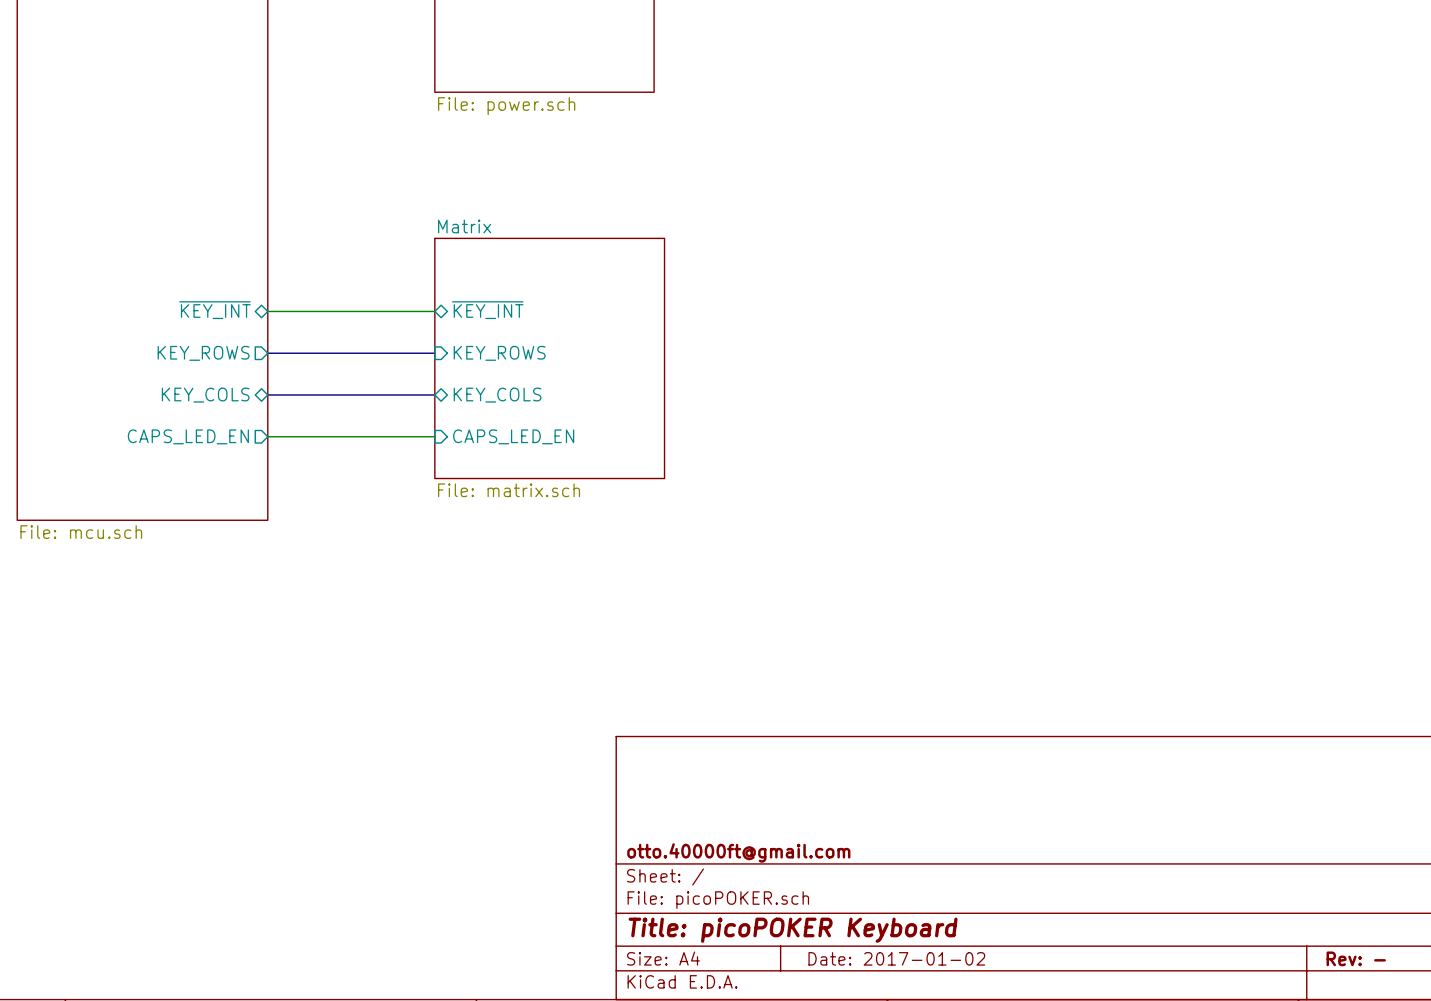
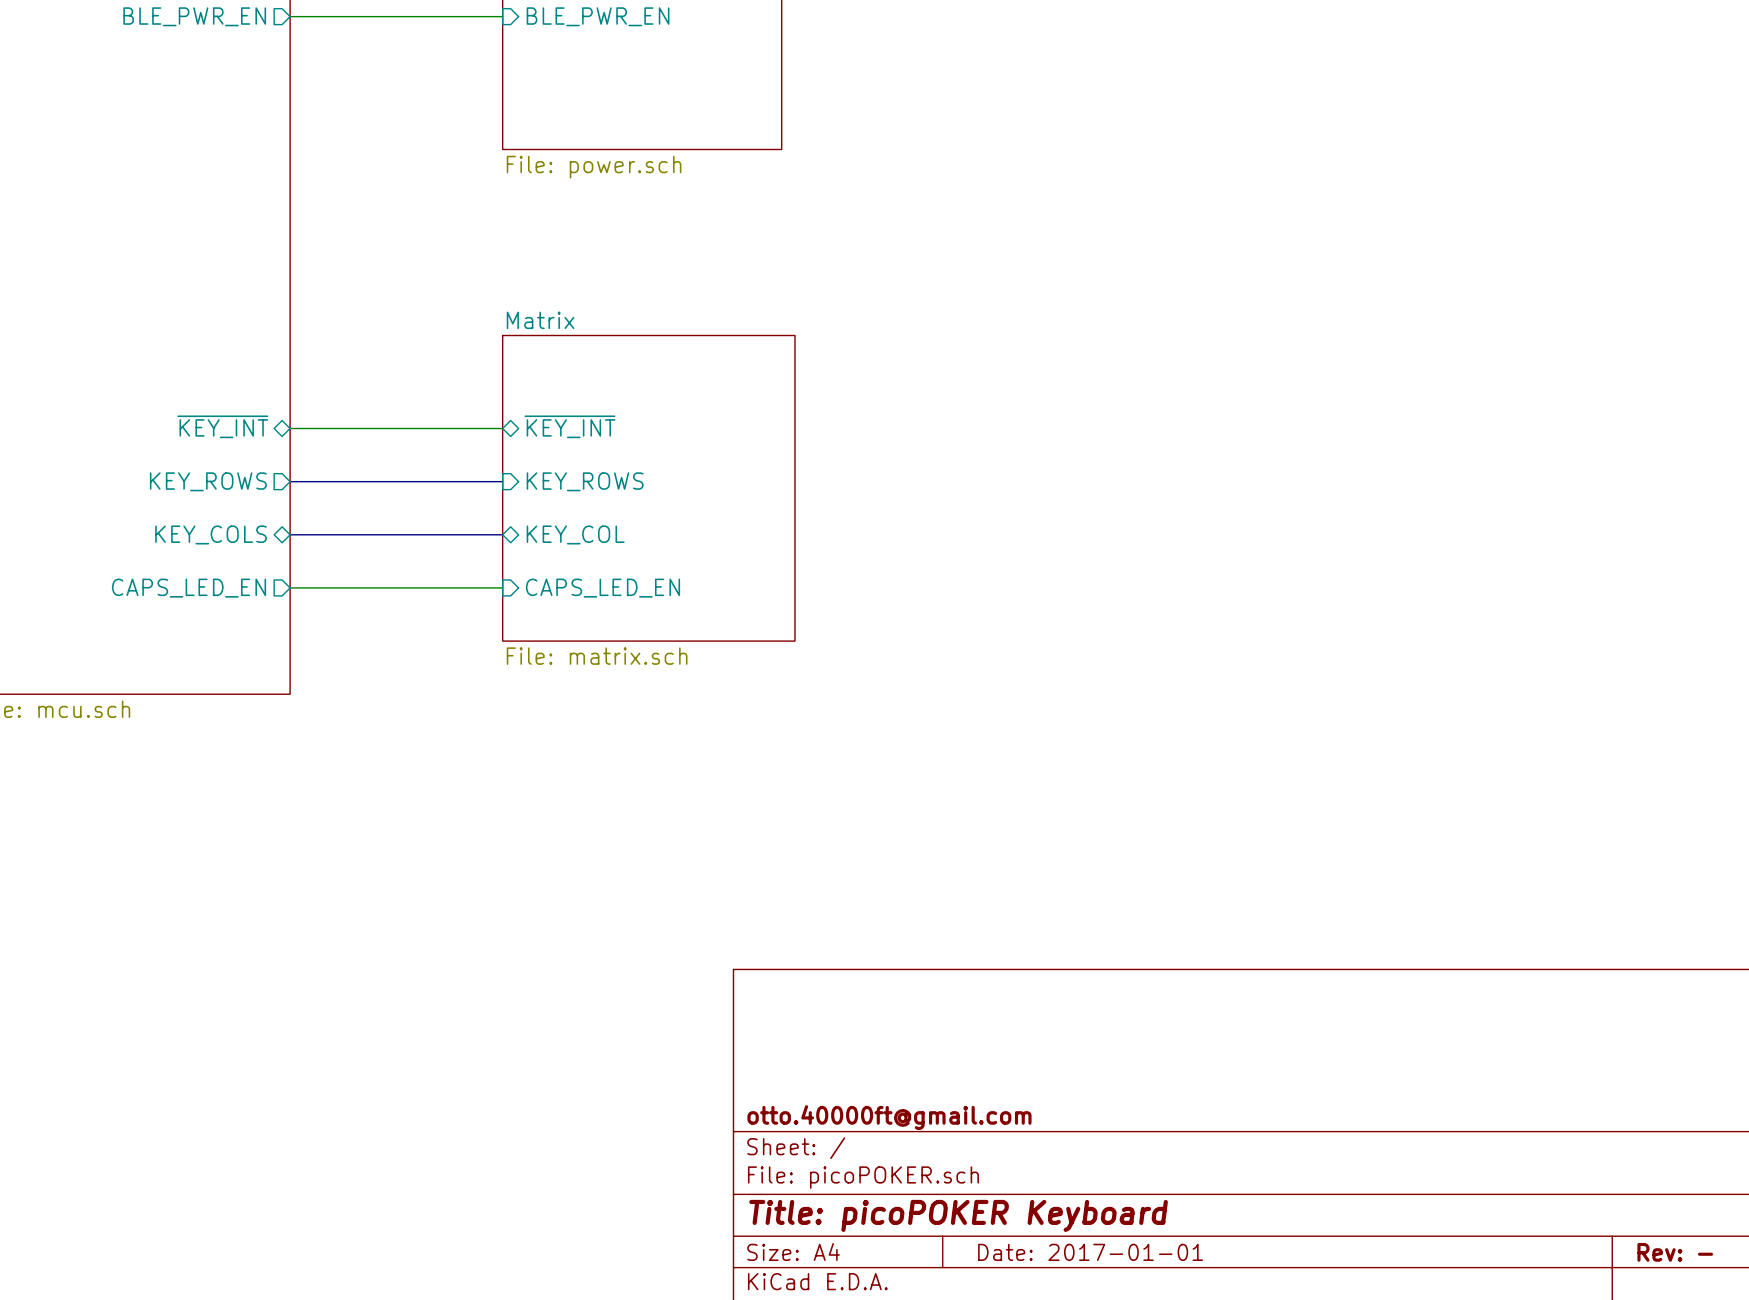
sheet pin: KEY_COLS (497, 395) -> KEY_COL (575, 534)
title block: Date: 2017-01-02 (896, 958) -> Date: 2017-01-01 (1090, 1252)

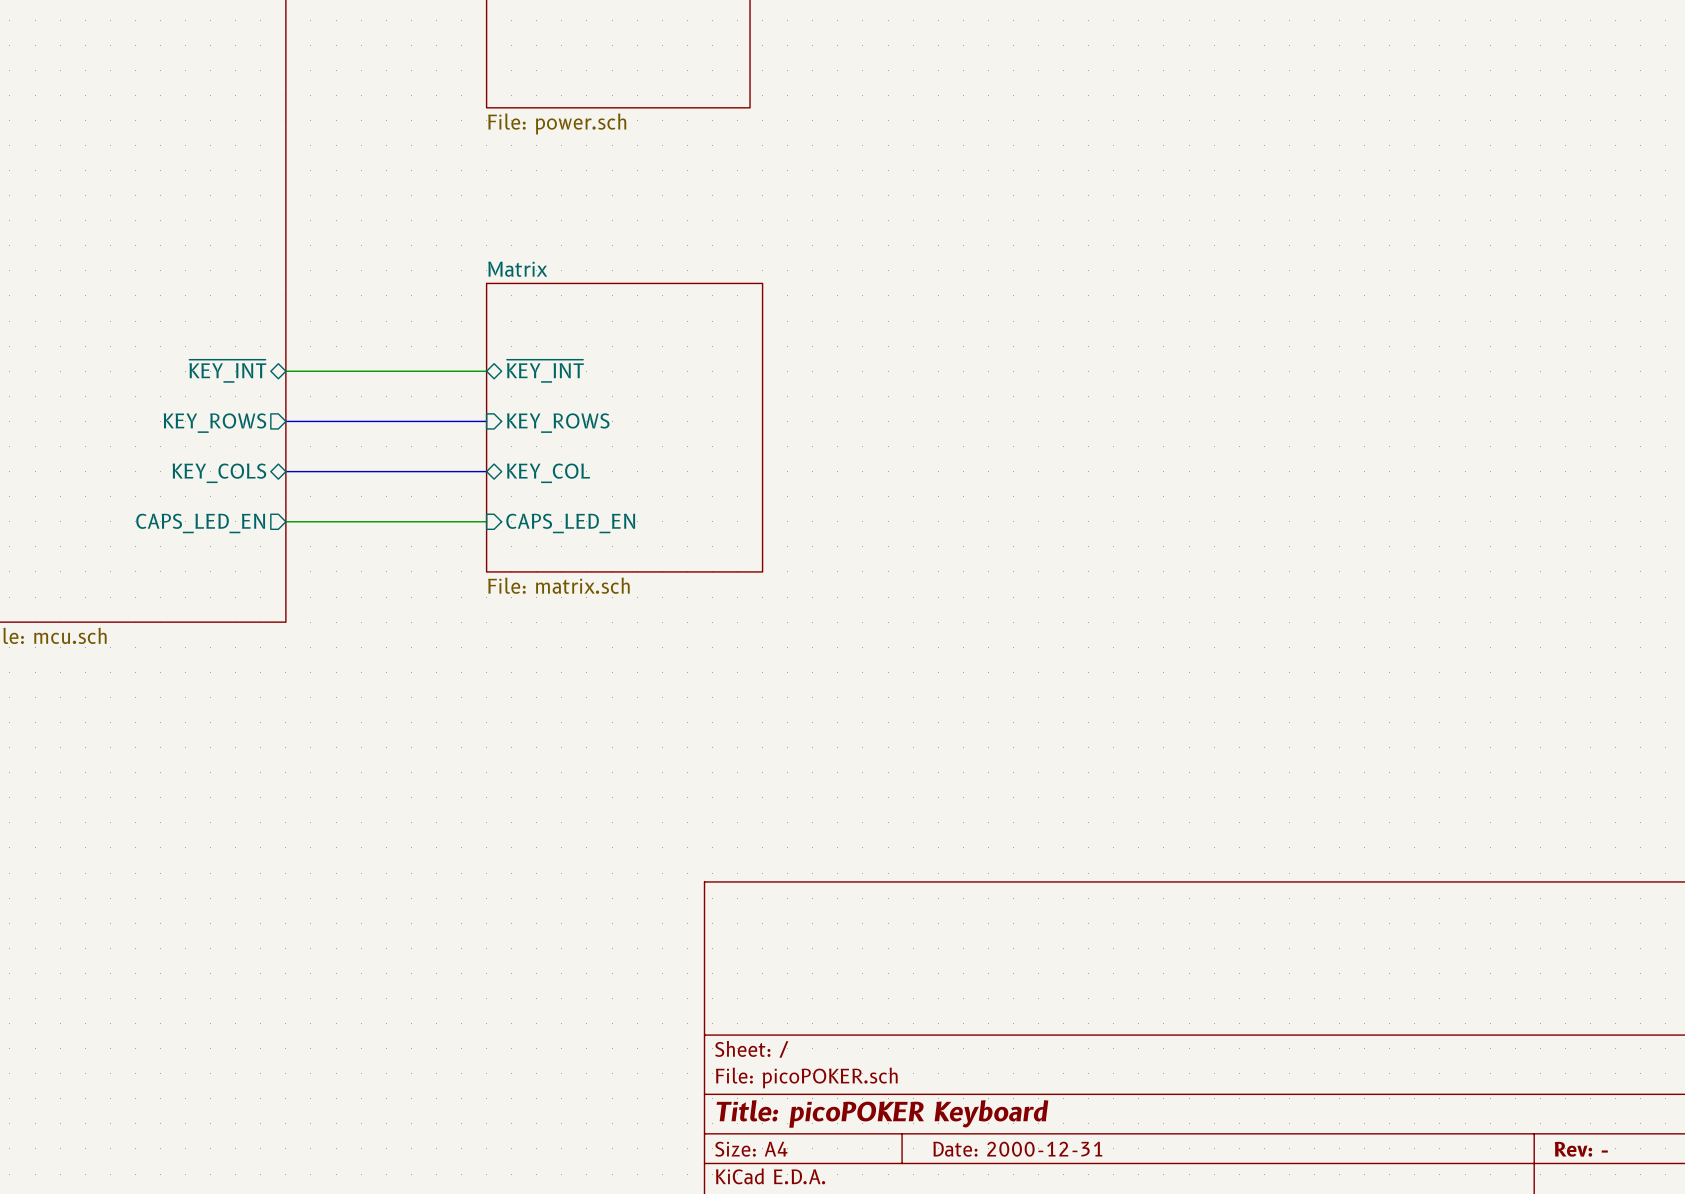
title block: otto.40000ft@gmail.com (889, 1117) -> none
title block: Date: 2017-01-01 (1090, 1252) -> Date: 2000-12-31 (1017, 1149)

